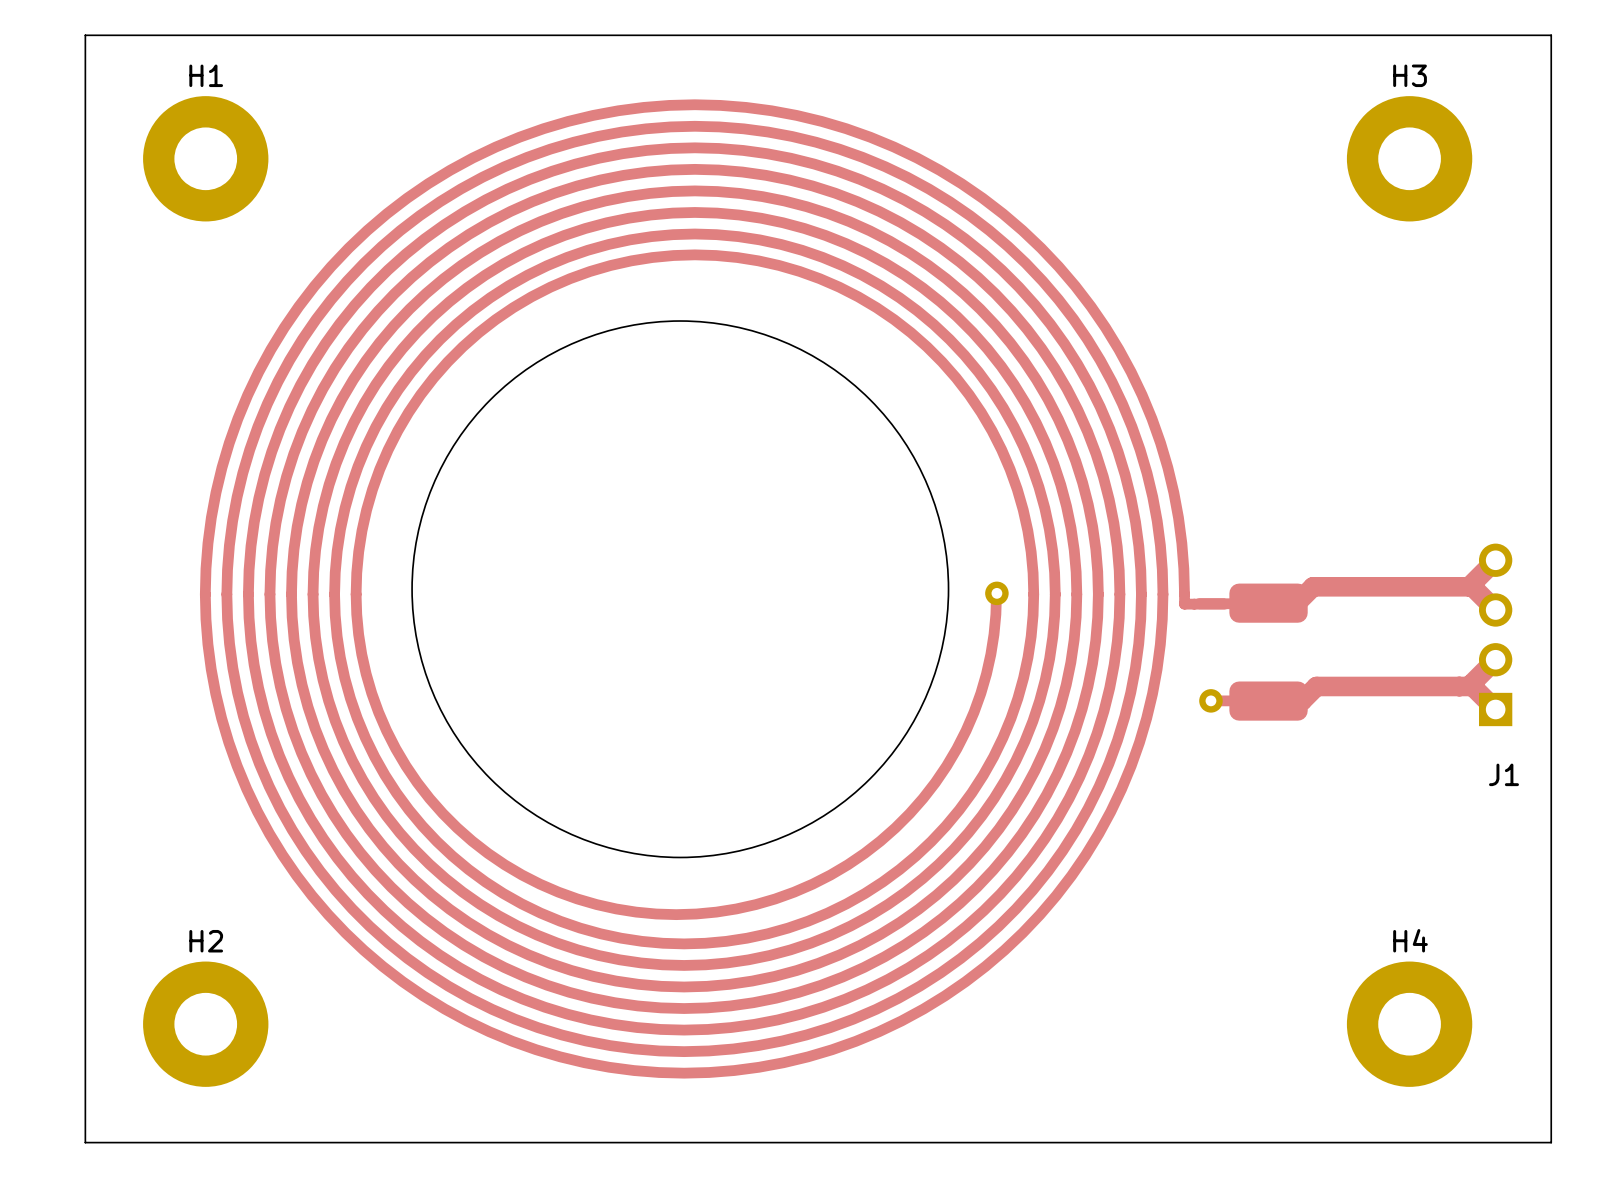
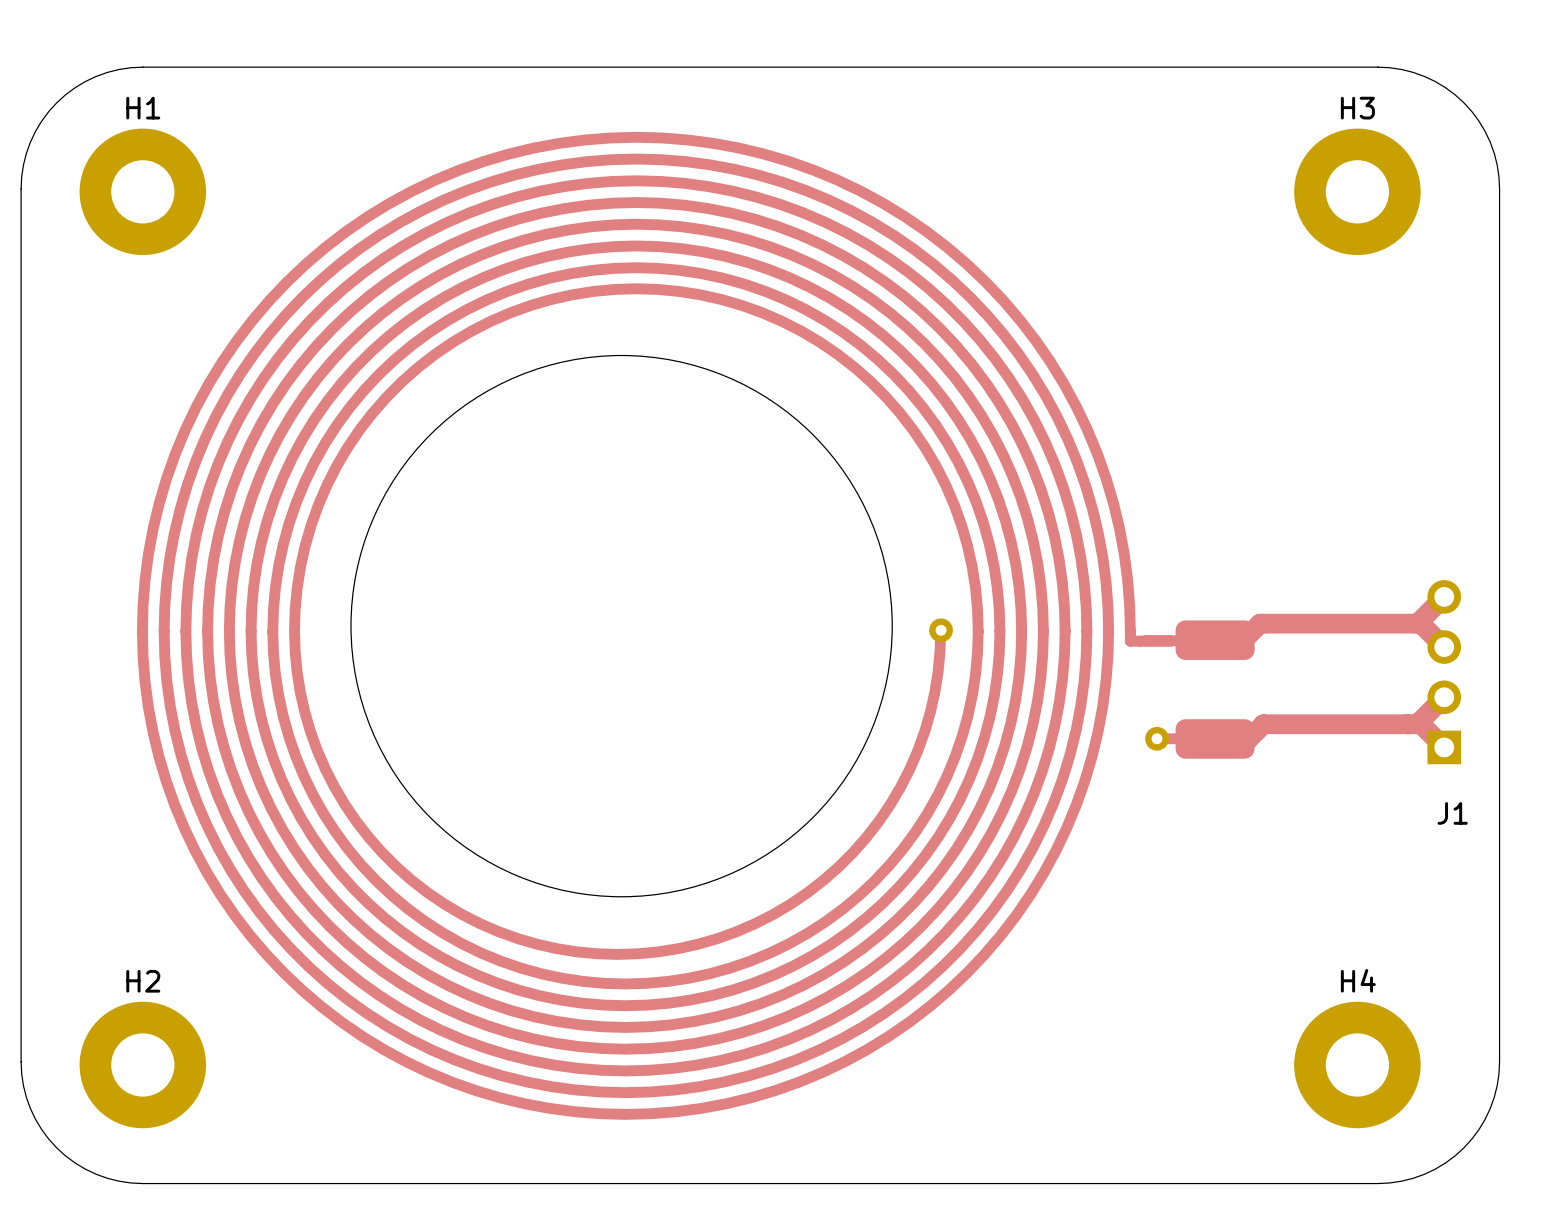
board edge: (85, 35) (1551, 35) (1551, 1142) (85, 1142) (85, 35) -> (142, 67) (119, 69) (96, 76) (75, 87) (56, 102) (35, 131) (26, 153) (21, 176) (21, 1061) (23, 1085) (35, 1119) (48, 1139) (65, 1155) (85, 1169) (107, 1178) (142, 1183) (1377, 1183) (1401, 1181) (1424, 1174) (1445, 1163) (1471, 1139) (1485, 1119) (1494, 1097) (1499, 1061) (1499, 188) (1497, 165) (1485, 131) (1471, 111) (1455, 94) (1435, 81) (1413, 72) (1377, 67) (142, 67)

